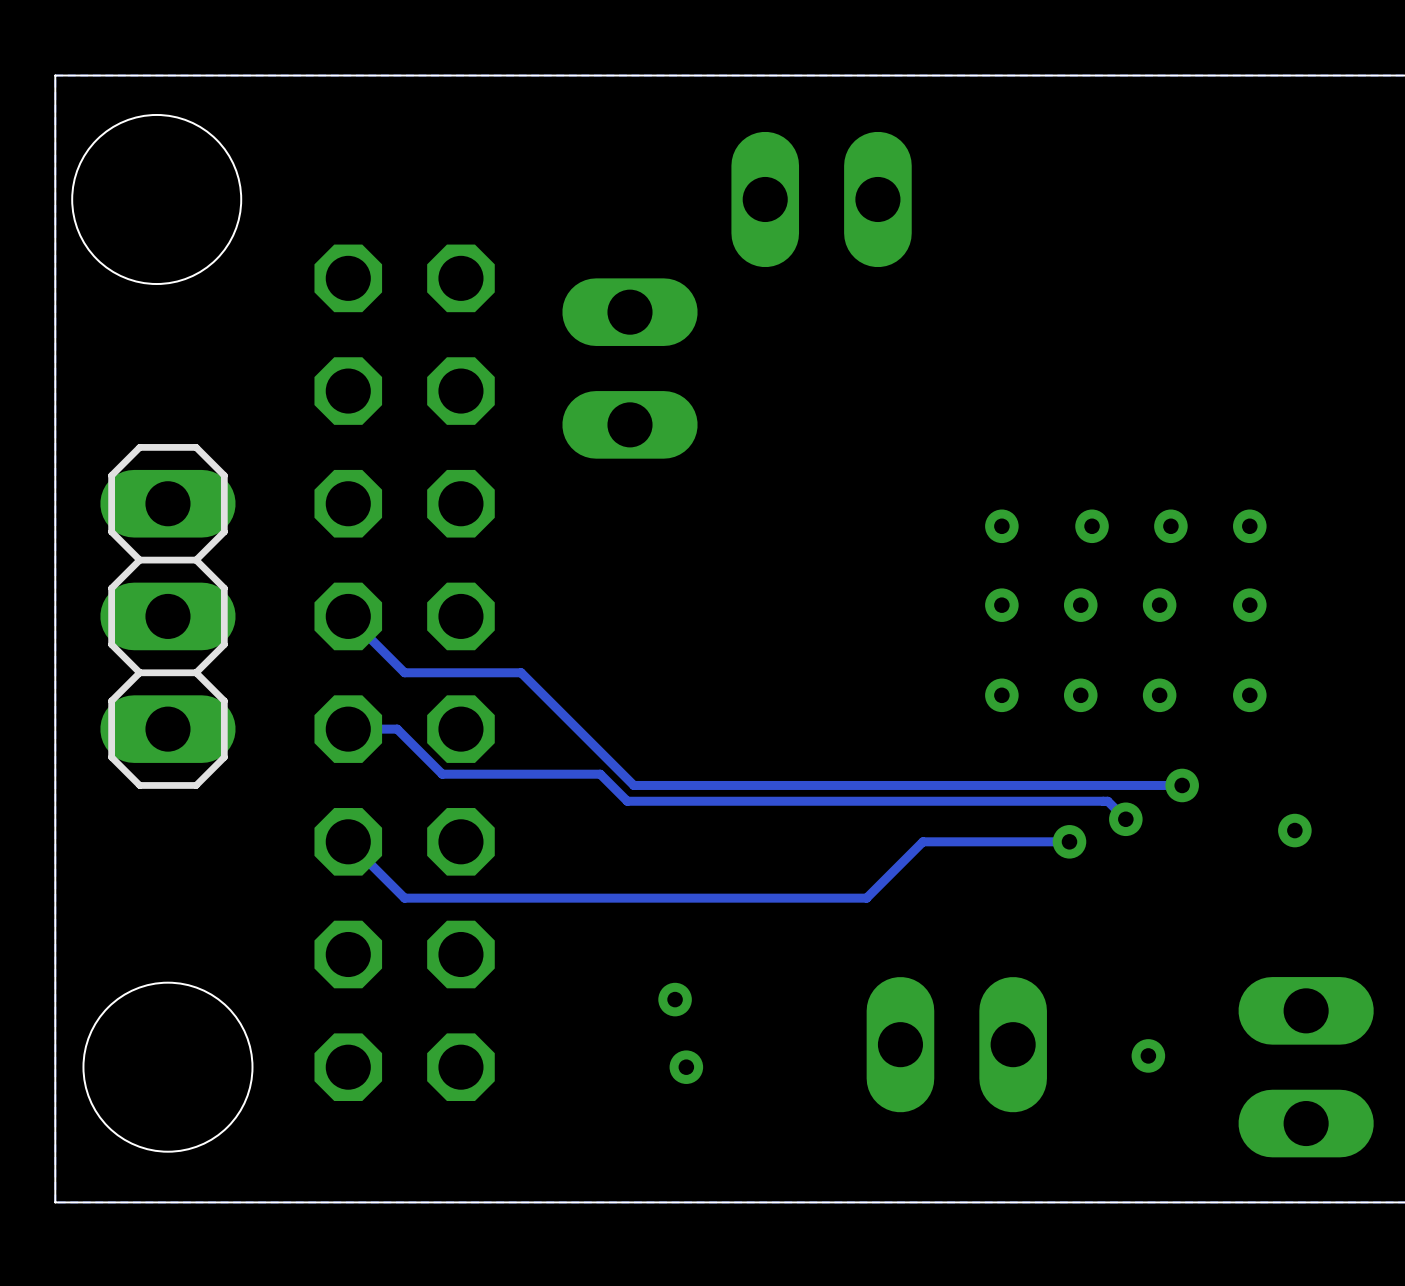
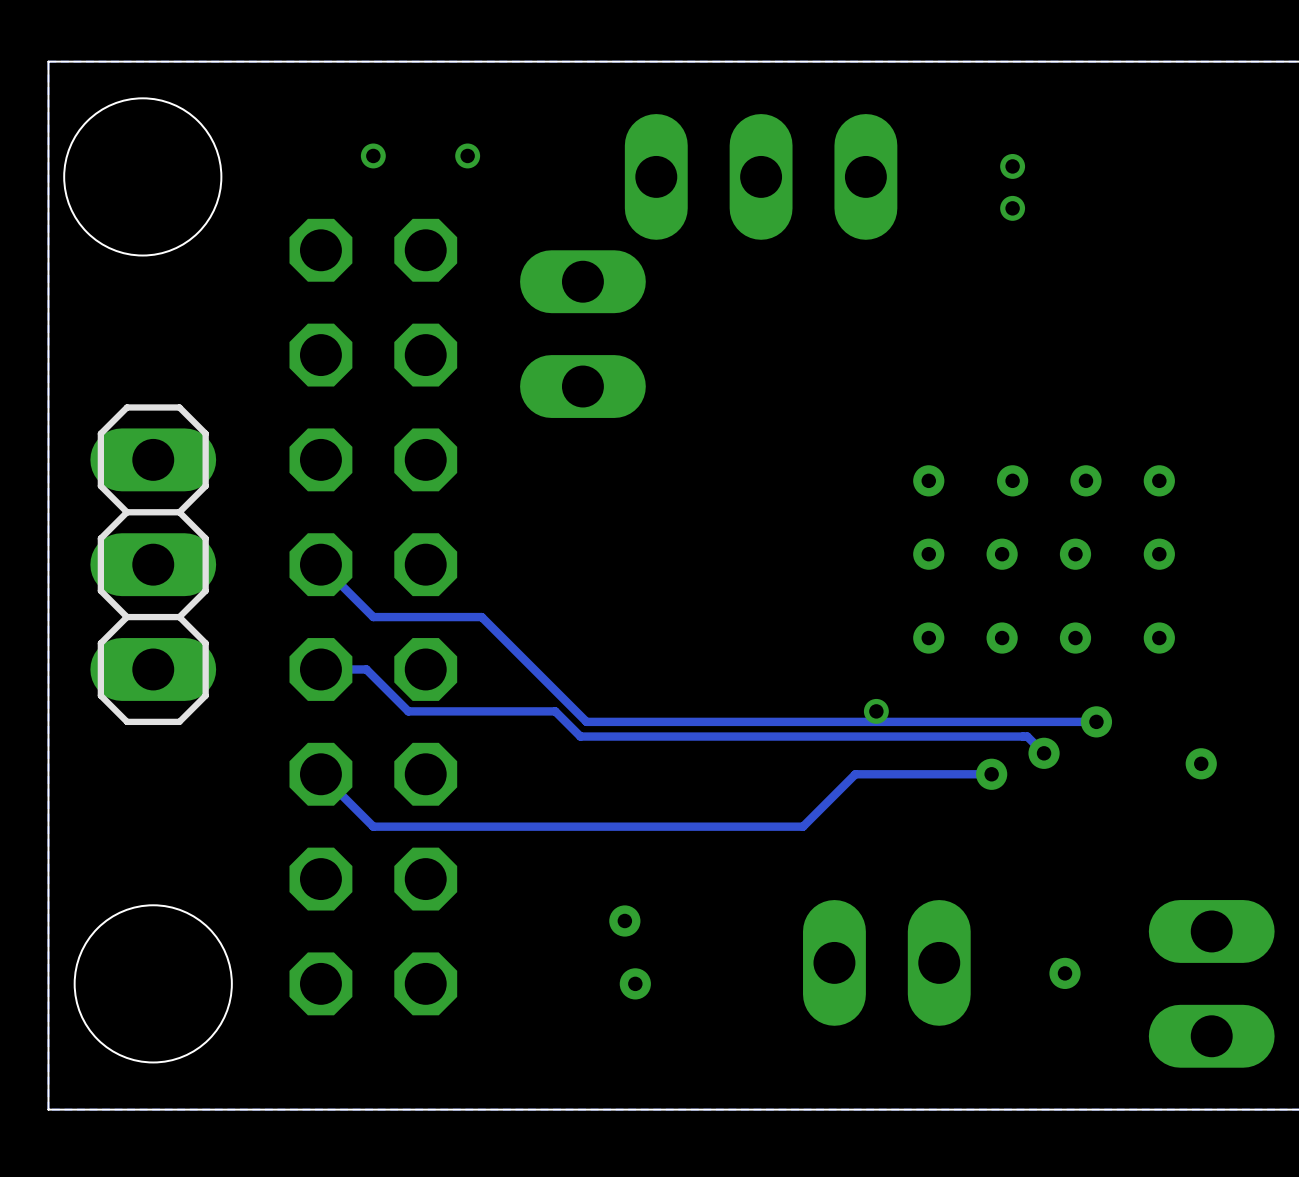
part footprint: [731, 131, 912, 268] -> [624, 114, 898, 240]
via: none -> (373, 155)
via: none -> (467, 155)
via: none -> (1012, 166)
via: none -> (1012, 208)
via: none -> (876, 711)

